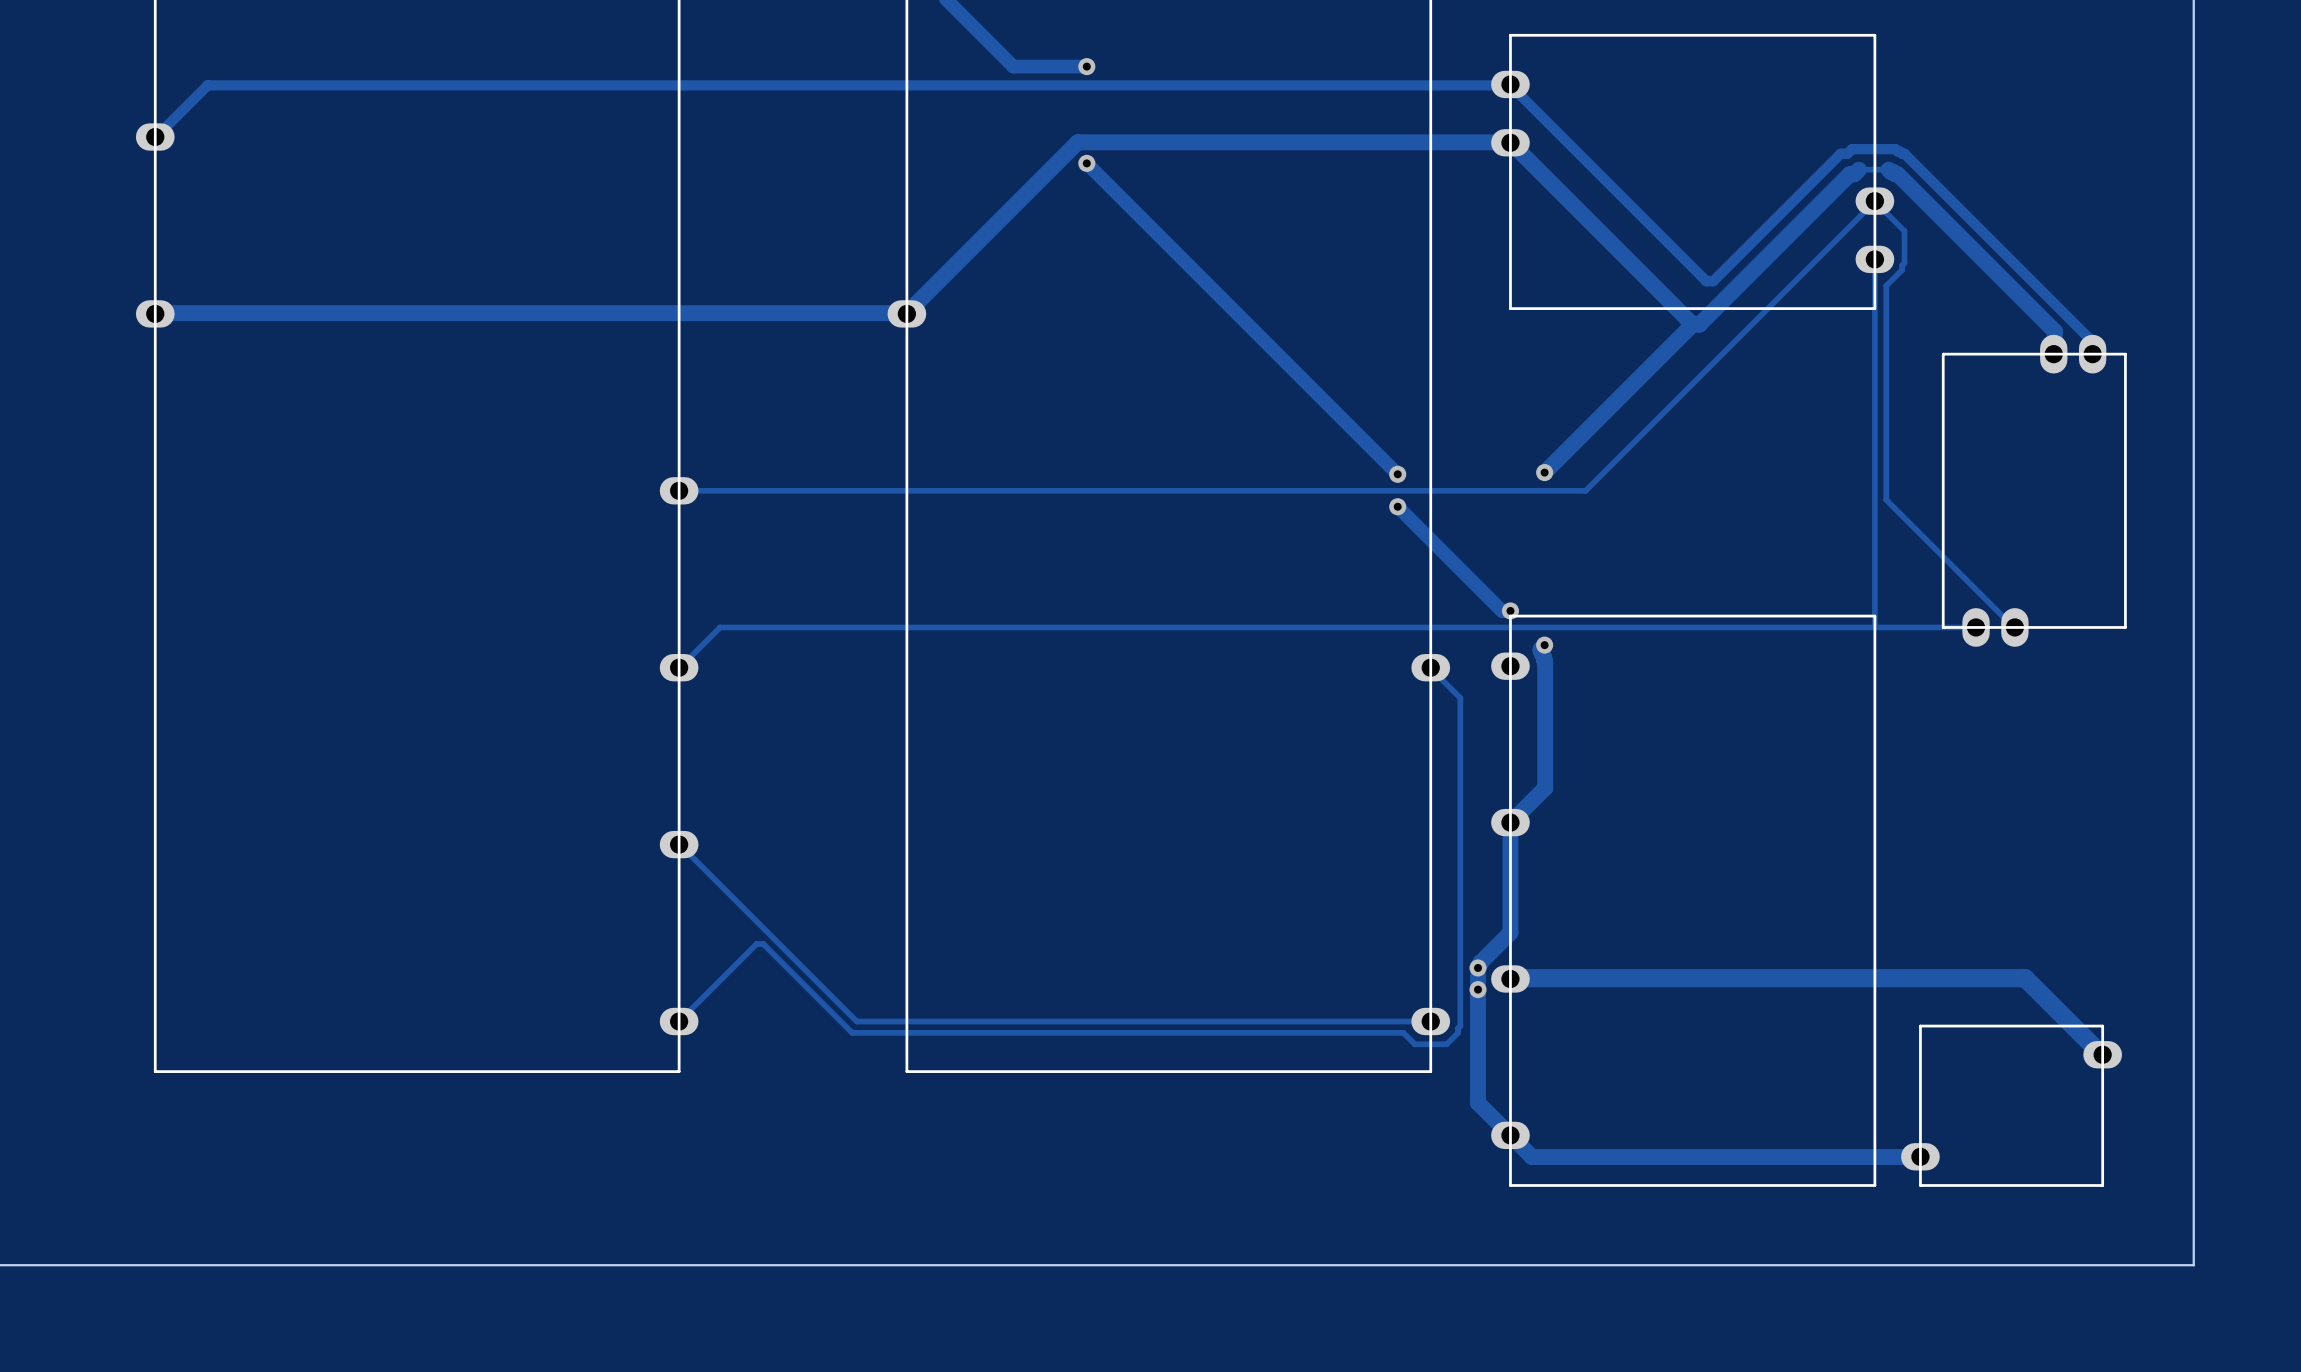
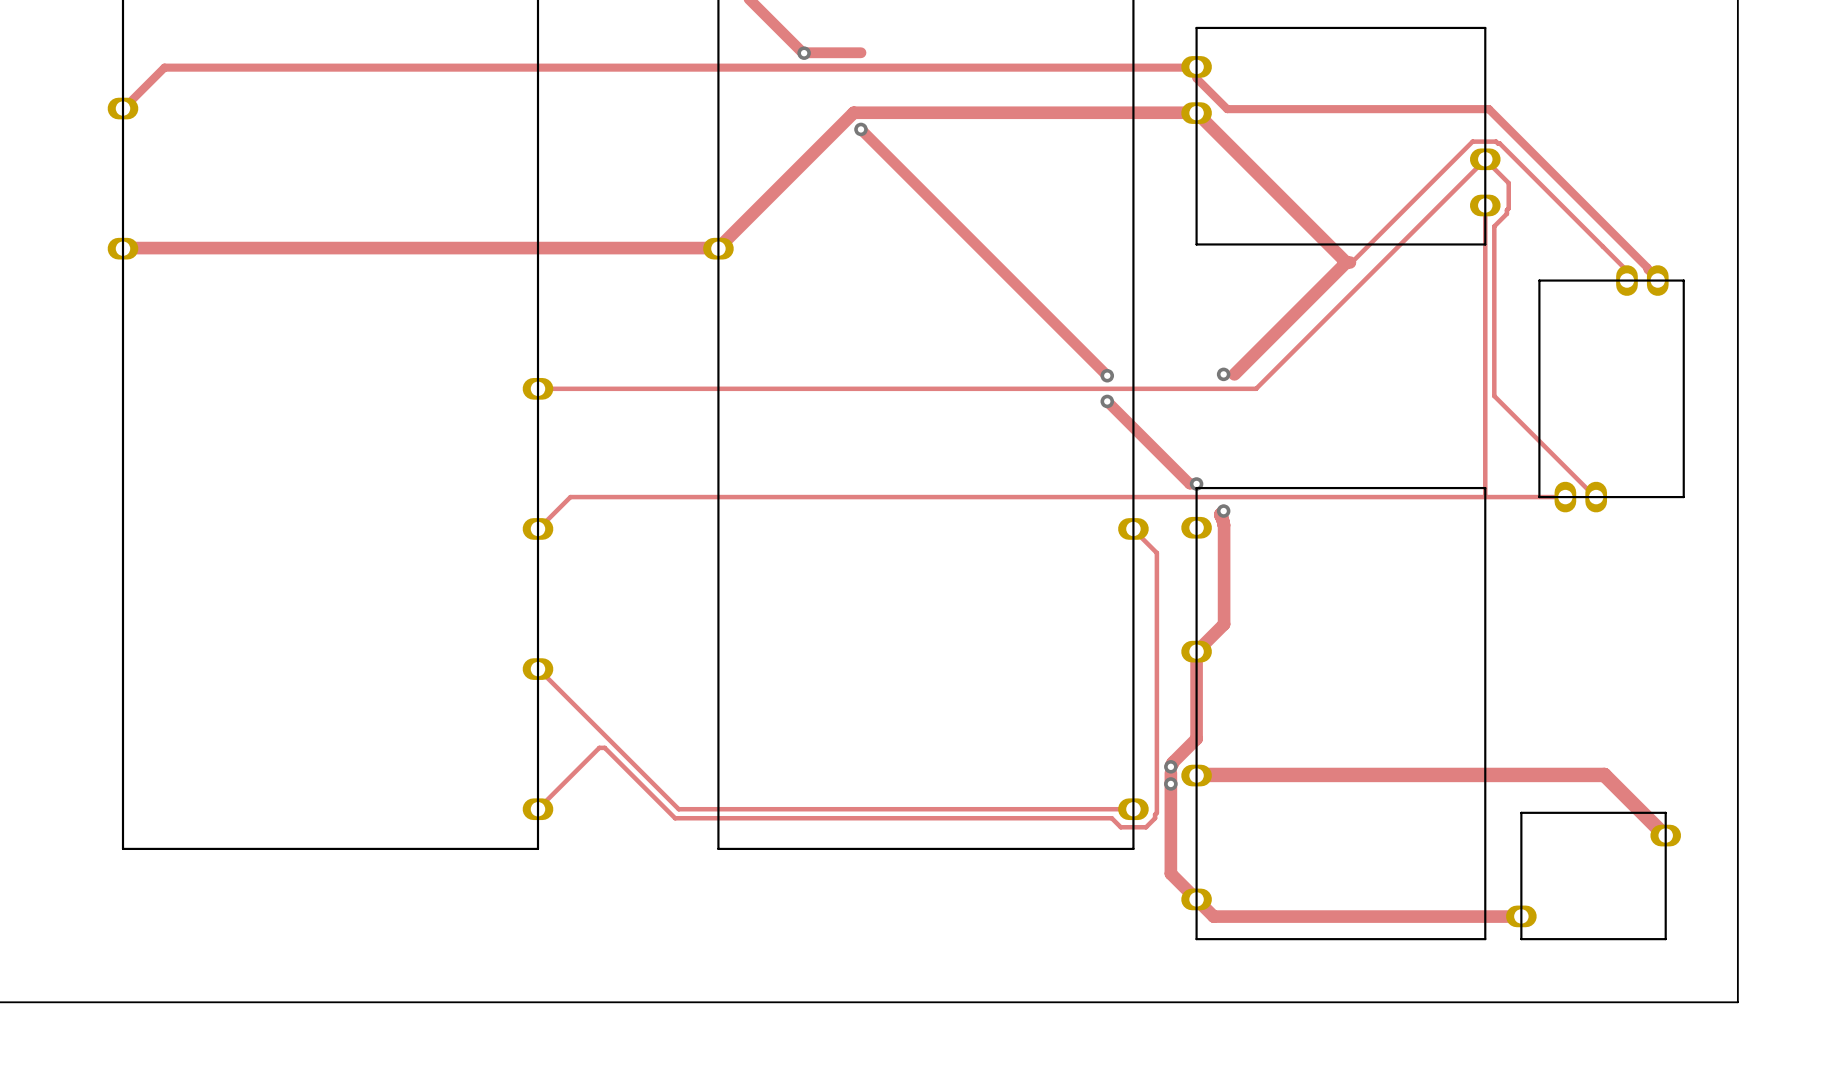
via position: (1086, 66) -> (804, 53)
track: (1510, 85) (1706, 281) (1713, 281) (1840, 153) (1847, 153) (1852, 149) (1895, 149) (1904, 153) (2093, 342) (2093, 354) -> (1196, 67) (1196, 78) (1227, 109) (1488, 109) (1658, 280)
track: none -> (1346, 262) (1234, 374)
track: (2054, 342) (2054, 331) (1897, 174) (1888, 169) (1858, 169) (1854, 174) (1849, 174) (1699, 324) (1692, 324) (1544, 472) -> (1627, 271) (1496, 141) (1472, 141) (1351, 262) (1346, 262)

